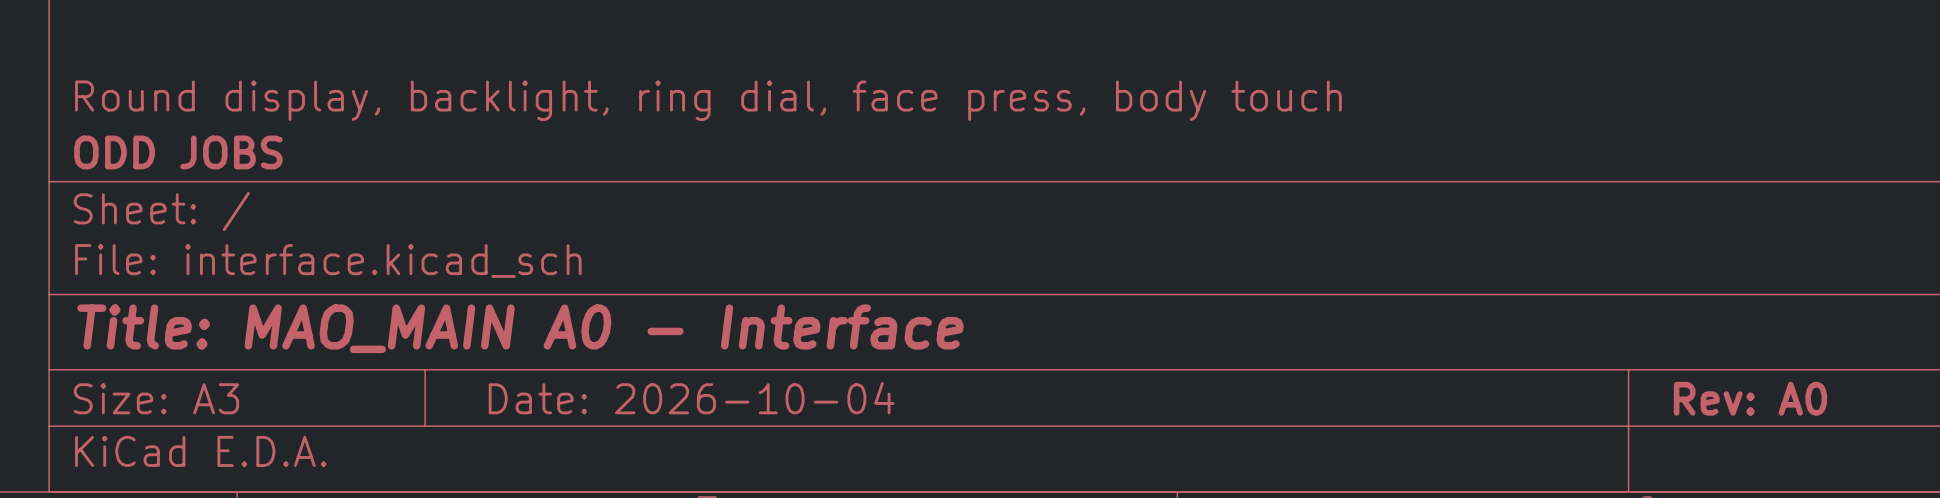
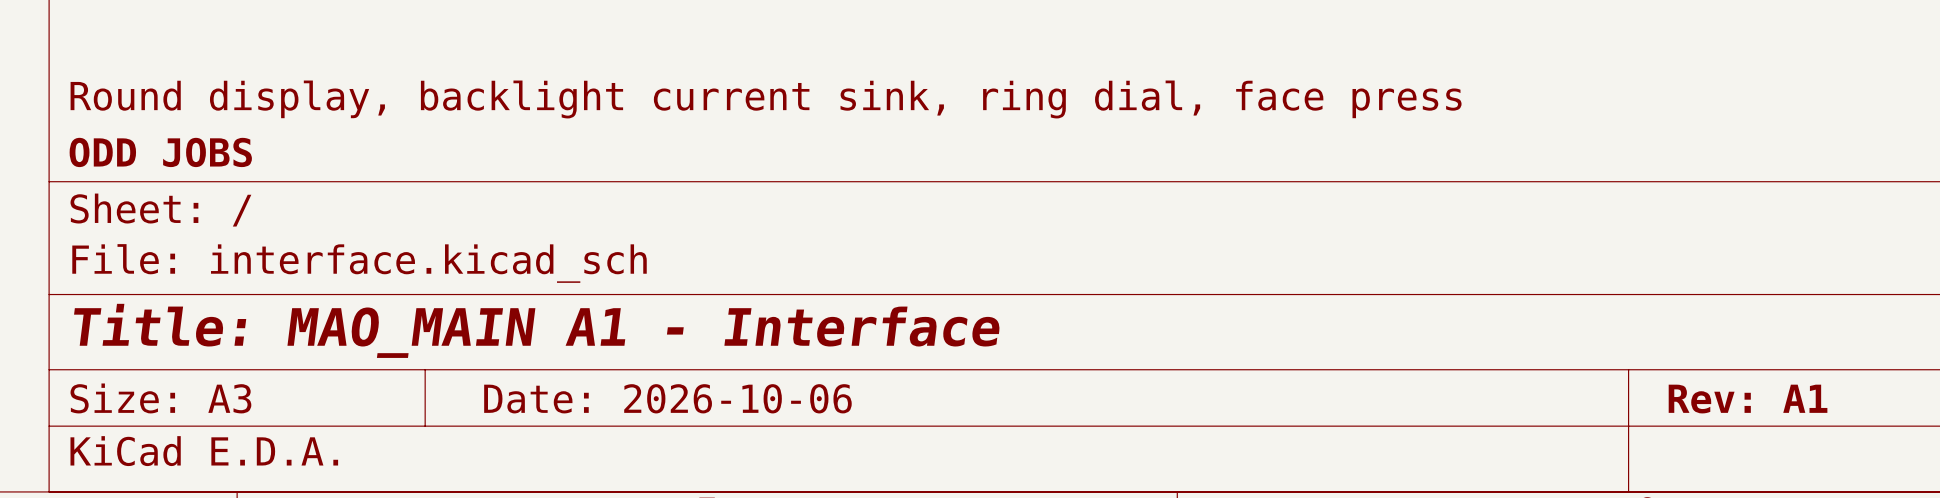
title block: Round display, backlight, ring dial, face press, body touch (708, 100) -> Round display, backlight current sink, ring dial, face press (766, 99)
title block: Title: MAO_MAIN A0 - Interface (520, 328) -> Title: MAO_MAIN A1 - Interface (537, 330)
title block: Date: 2026-10-04 (691, 398) -> Date: 2026-10-06 (667, 398)
title block: Rev: A0 (1750, 398) -> Rev: A1 (1748, 399)

